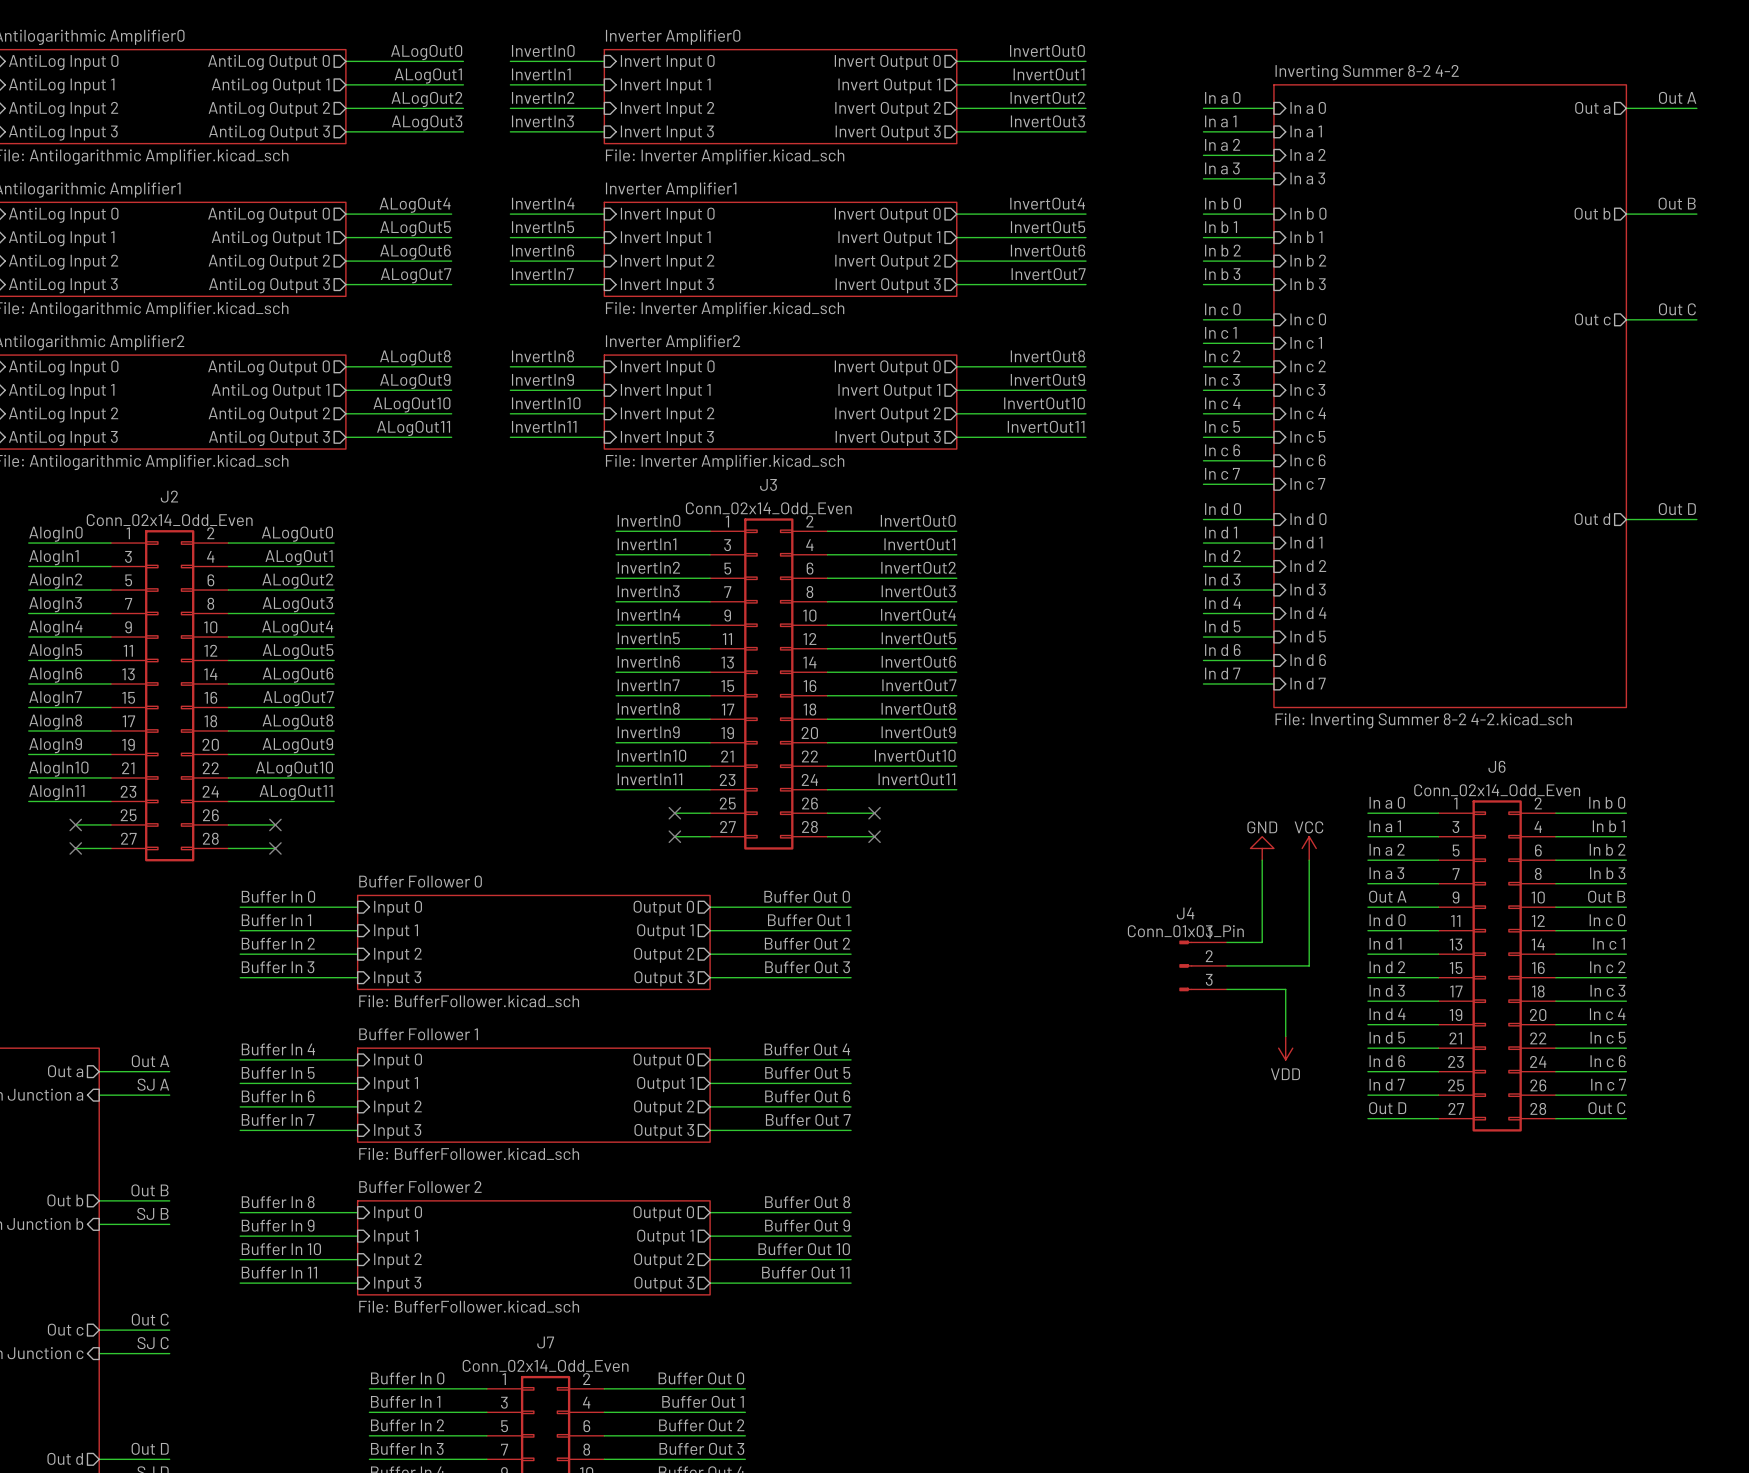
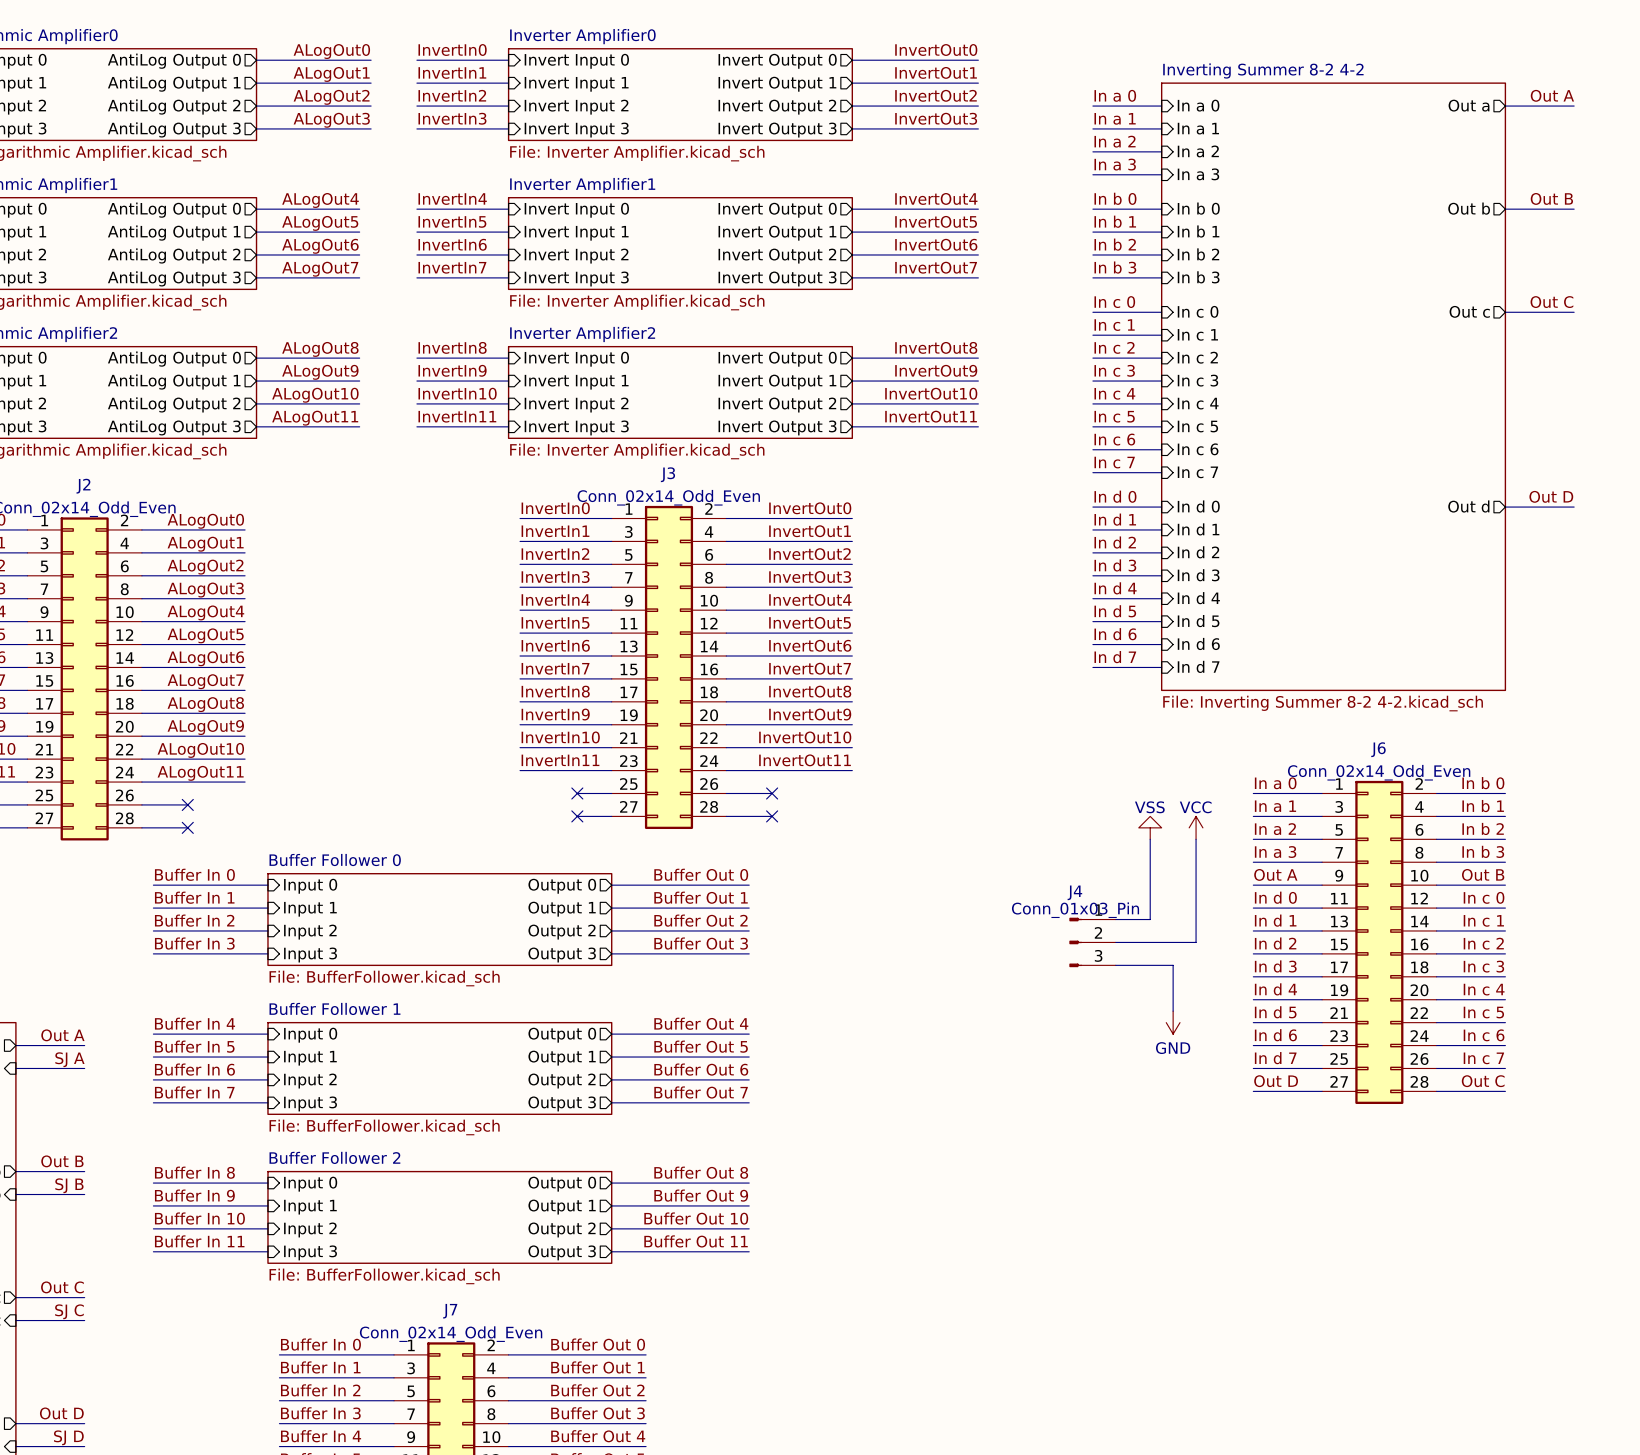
power symbol: GND (1262, 848) -> VSS (1150, 827)
power symbol: VDD (1285, 1048) -> GND (1173, 1022)

